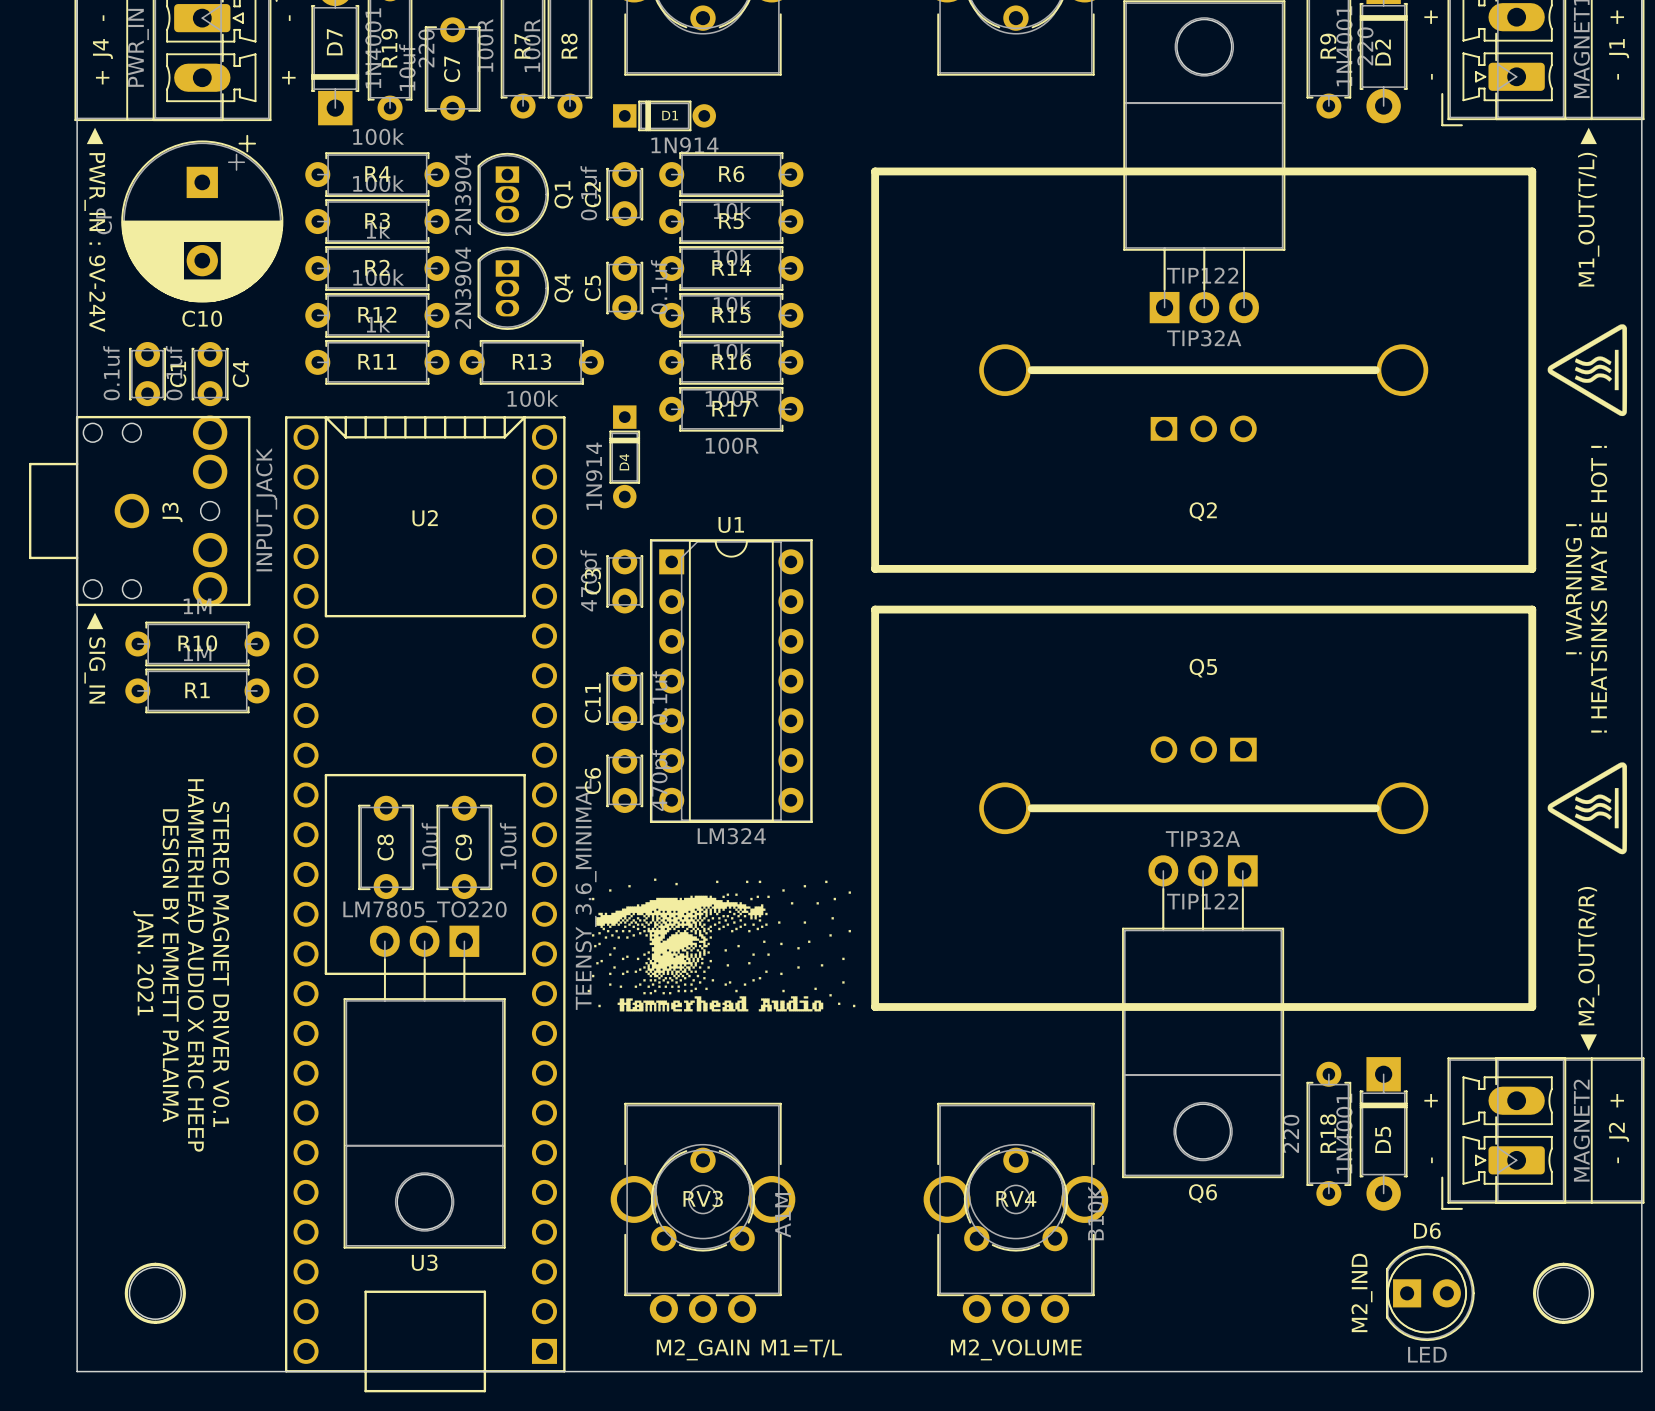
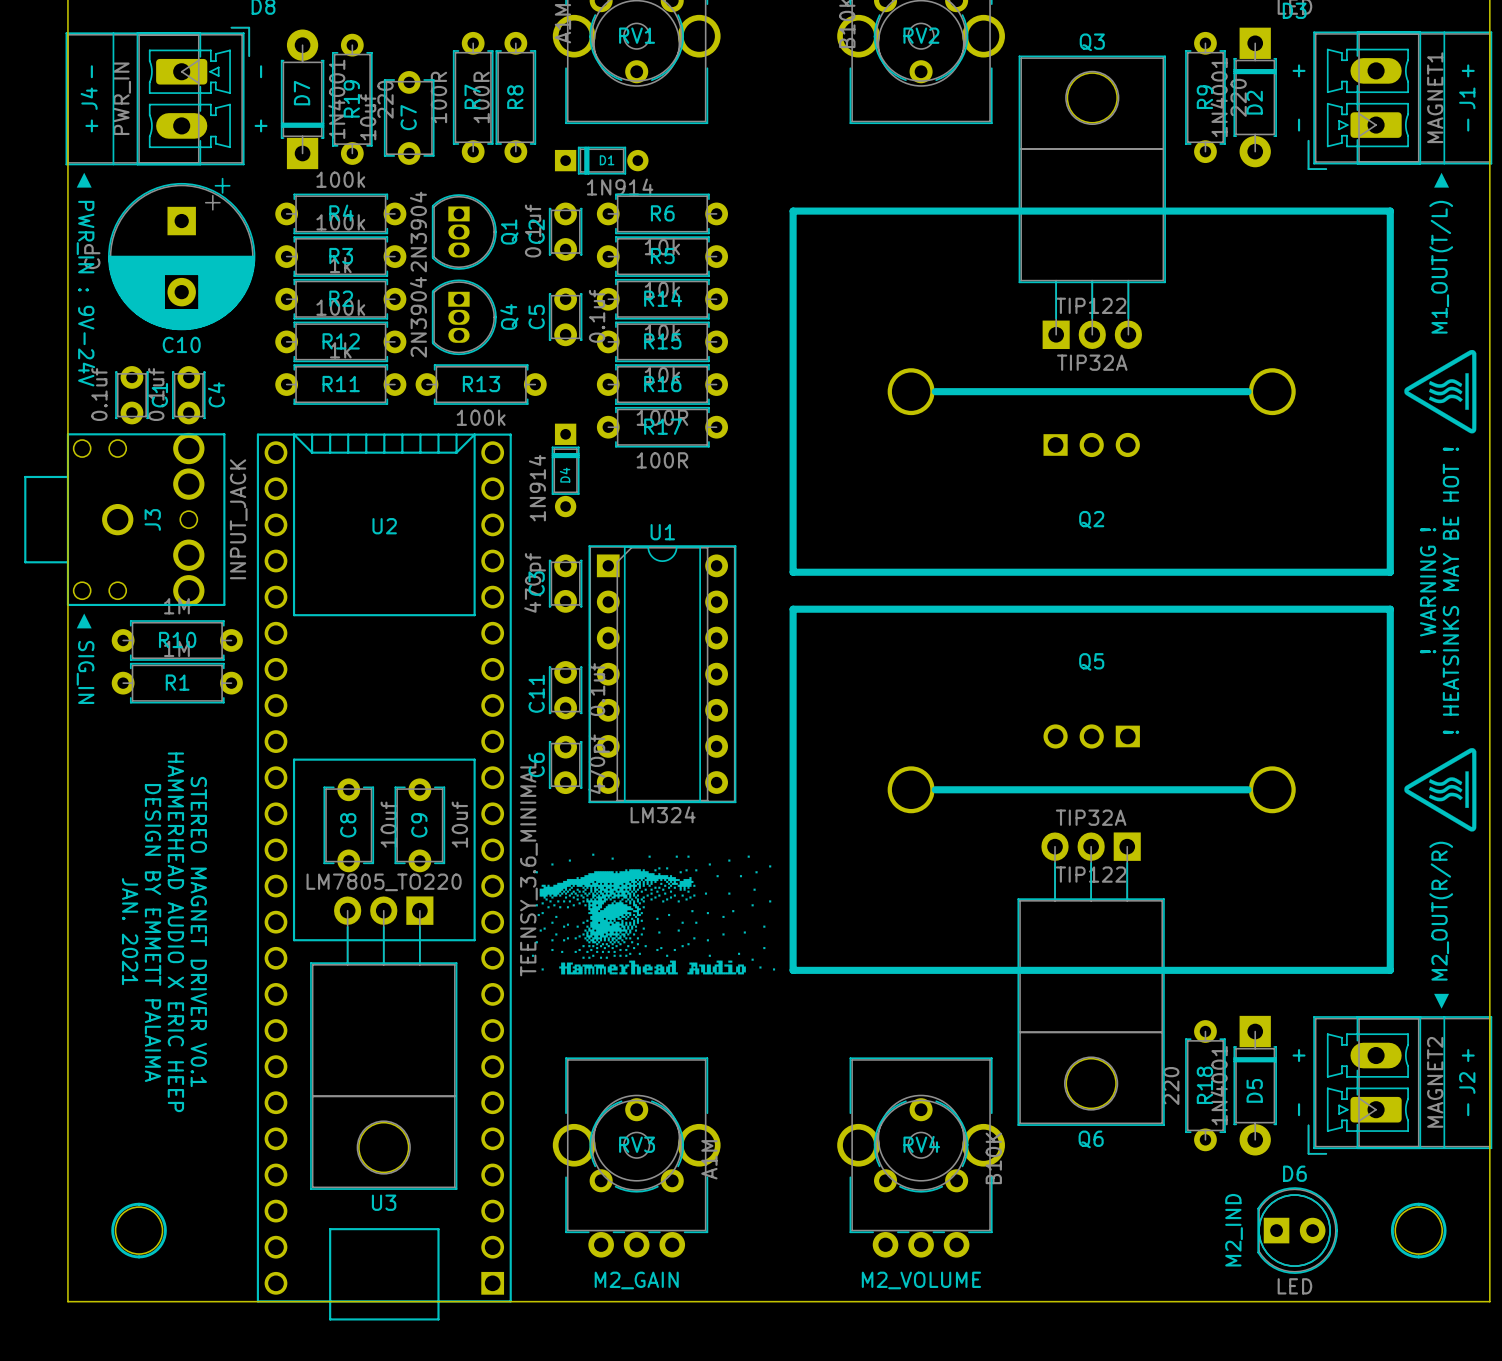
text: M1=T/L (801, 1348) -> none

